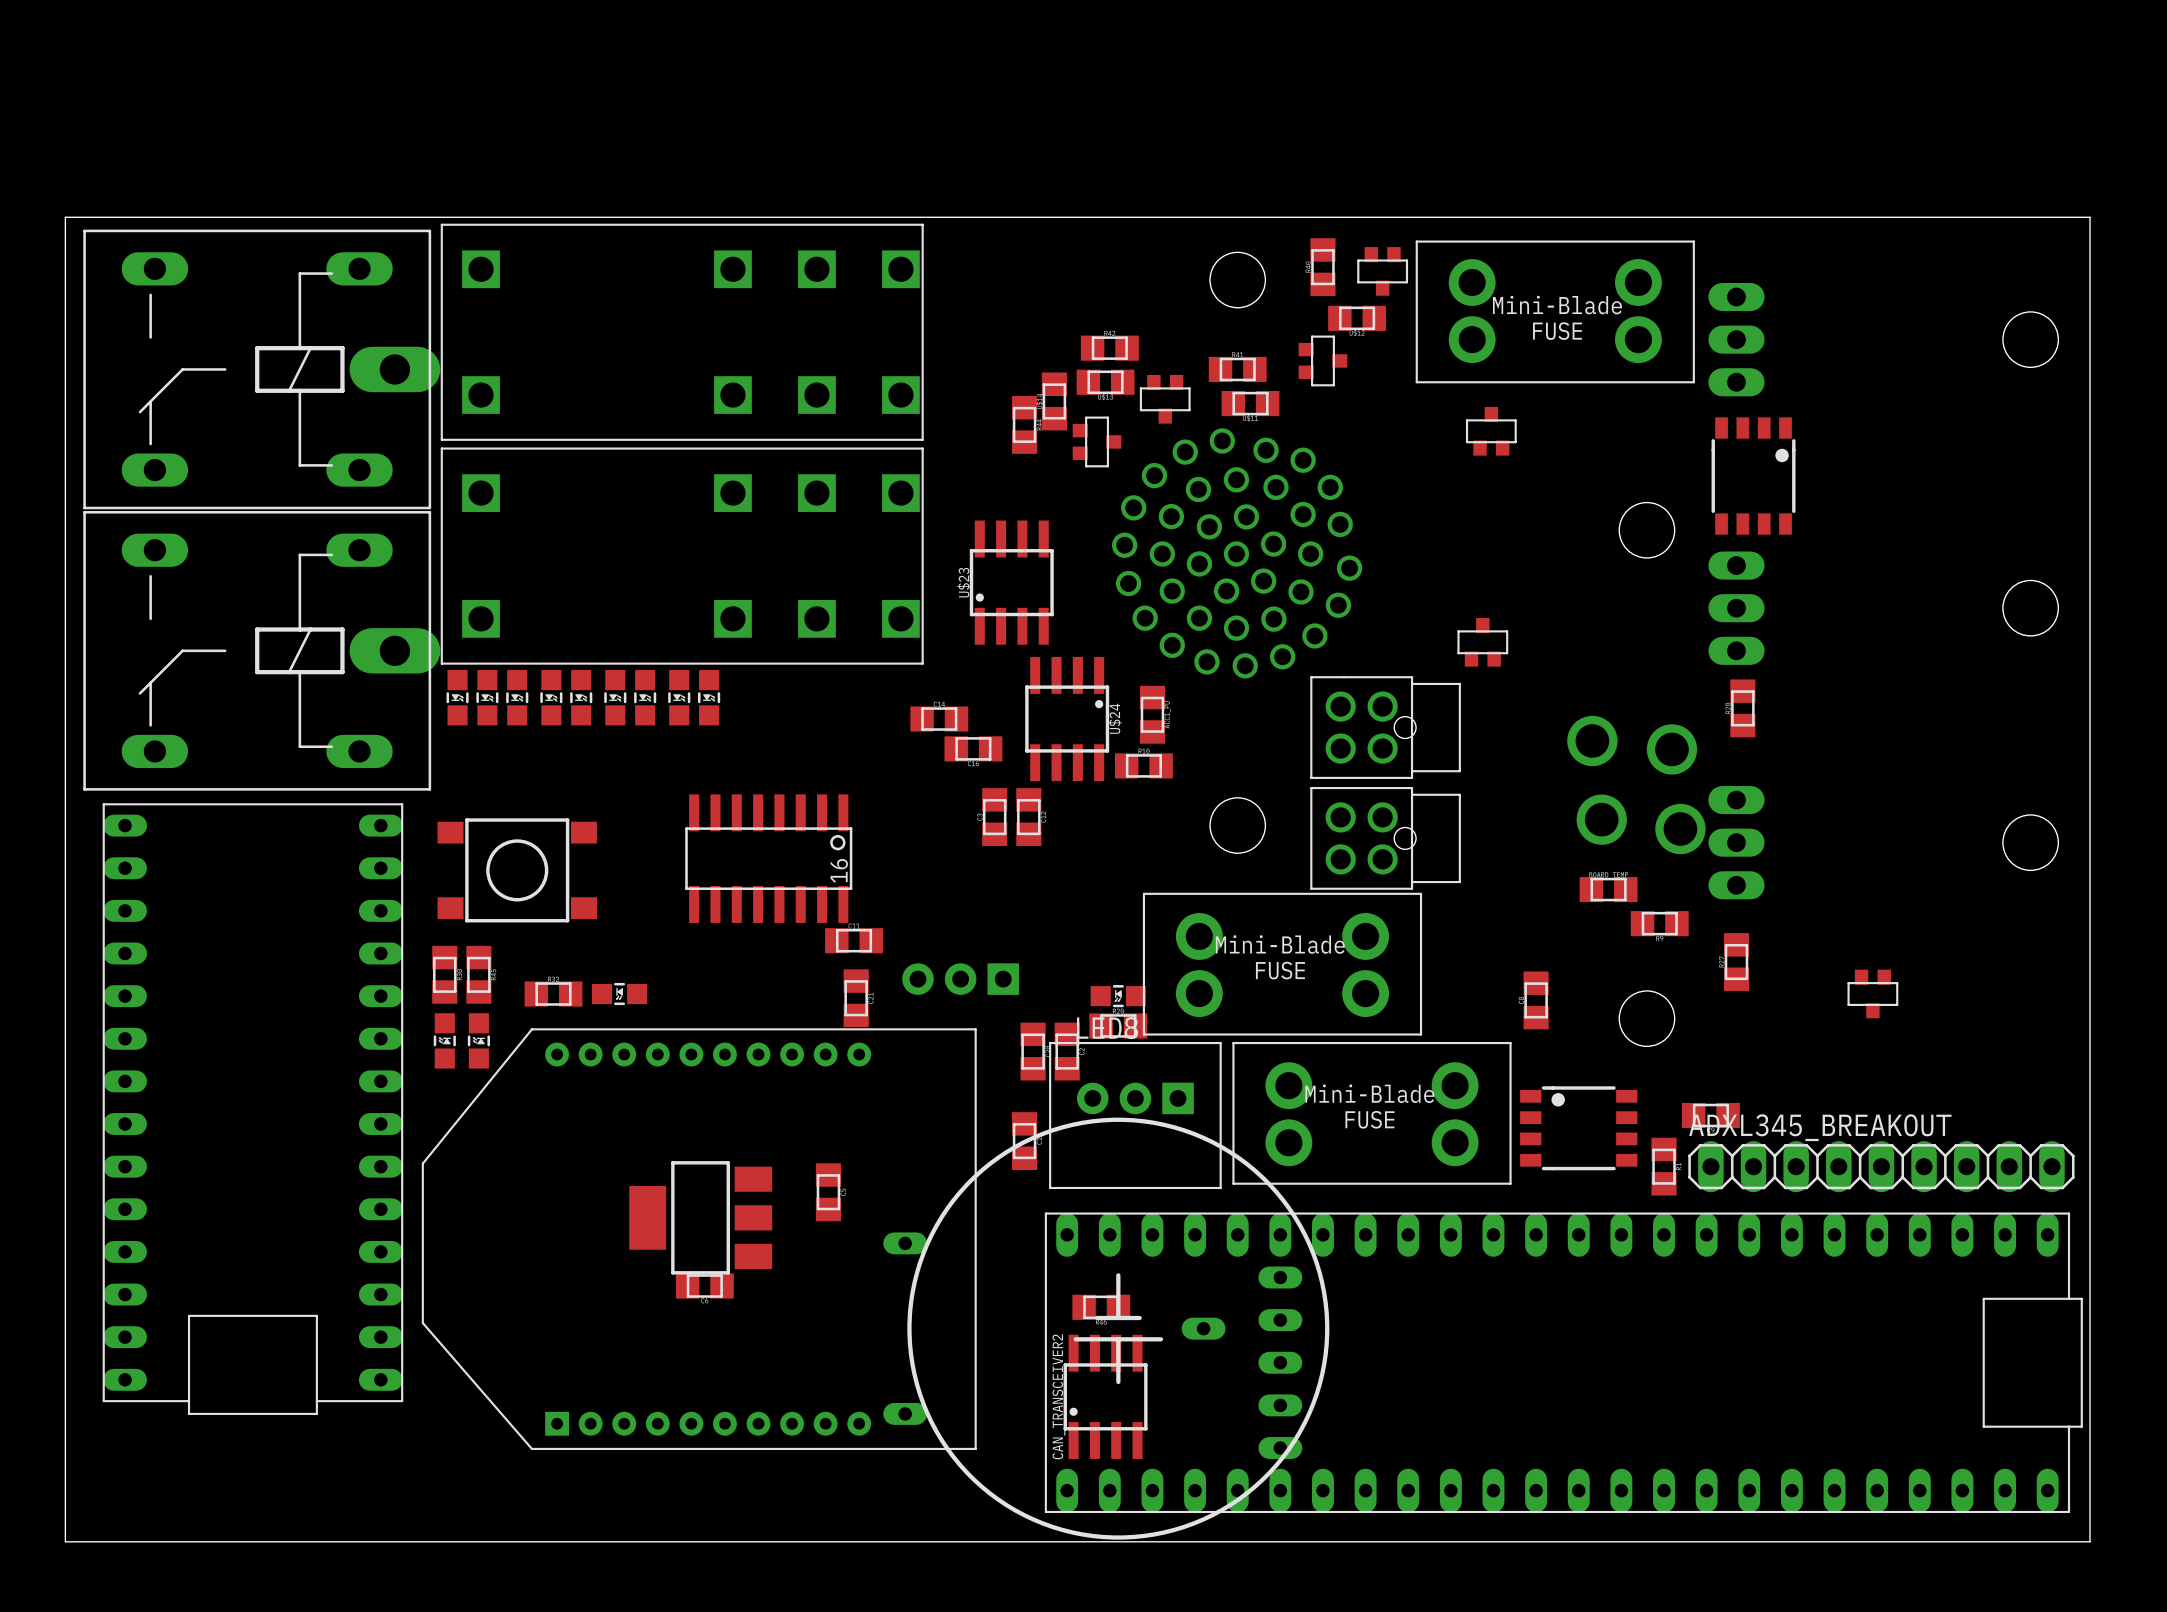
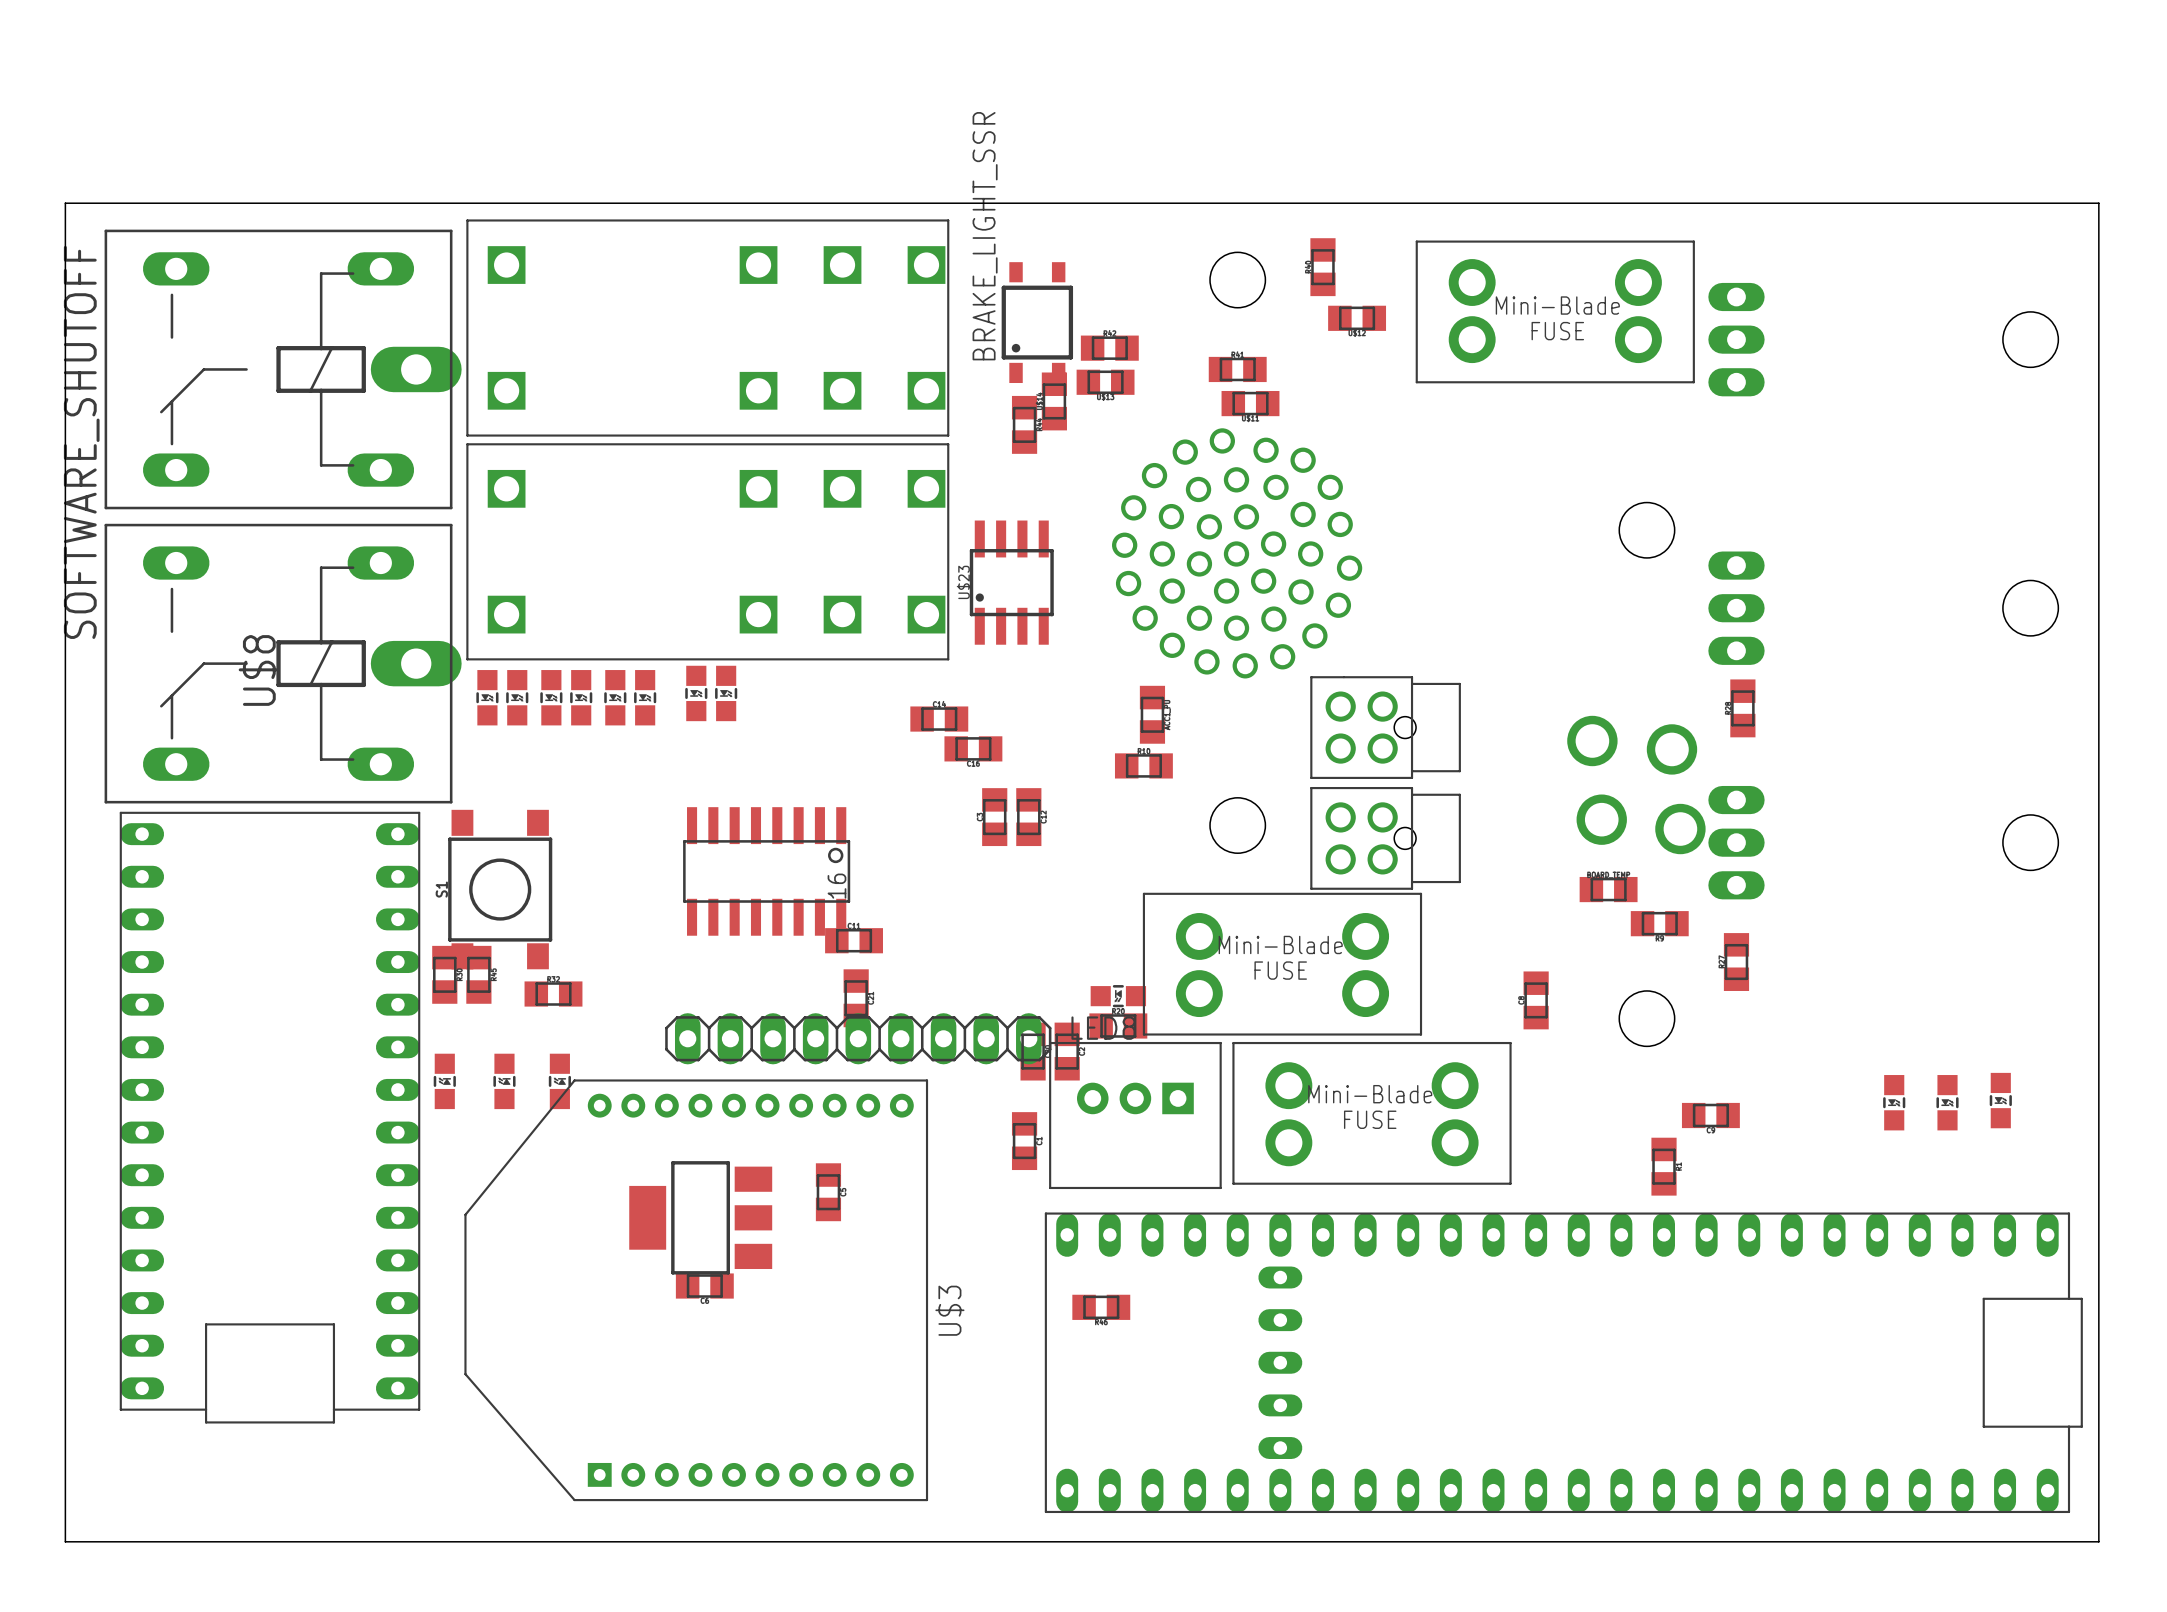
board edge: (65, 217) (2089, 217) (2089, 1541) -> (65, 217) (65, 203) (2098, 203) (2098, 1541) (2089, 1541)
part: (1382, 271) -> none
BRAKE_LIGHT_SSR: none -> (1037, 322)
part position: (682, 332) -> (707, 328)
part: (1322, 360) -> none
part: (261, 369) -> none
SOFTWARE_SHUTOFF: none -> (283, 369)
part: (1165, 399) -> none
part: (1491, 431) -> none
part: (1097, 441) -> none
part: (1753, 476) -> none
part position: (682, 556) -> (707, 551)
part: (1482, 642) -> none
part: (261, 650) -> none
U$8: none -> (283, 663)
part: none -> (696, 693)
part: none -> (726, 693)
part: (457, 697) -> none
part: (679, 697) -> none
part: (709, 697) -> none
U$24: (1067, 719) -> none
part position: (768, 858) -> (766, 871)
part: (517, 870) -> none
S1: none -> (500, 889)
part: (960, 979) -> none
part: (619, 994) -> none
part: (1872, 994) -> none
part: none -> (858, 1038)
part: (444, 1040) -> none
part: (478, 1040) -> none
part: none -> (444, 1081)
part: none -> (504, 1081)
part: none -> (559, 1081)
part: none -> (2000, 1100)
part: none -> (1894, 1102)
part: none -> (1947, 1102)
part position: (252, 1109) -> (270, 1117)
part: (1578, 1128) -> none
ADXL345_BREAKOUT: (1881, 1166) -> none
part: (699, 1239) -> none
U$3: none -> (696, 1290)
part: (1106, 1328) -> none
CAN_TRANSCEIVER2: (1105, 1396) -> none

